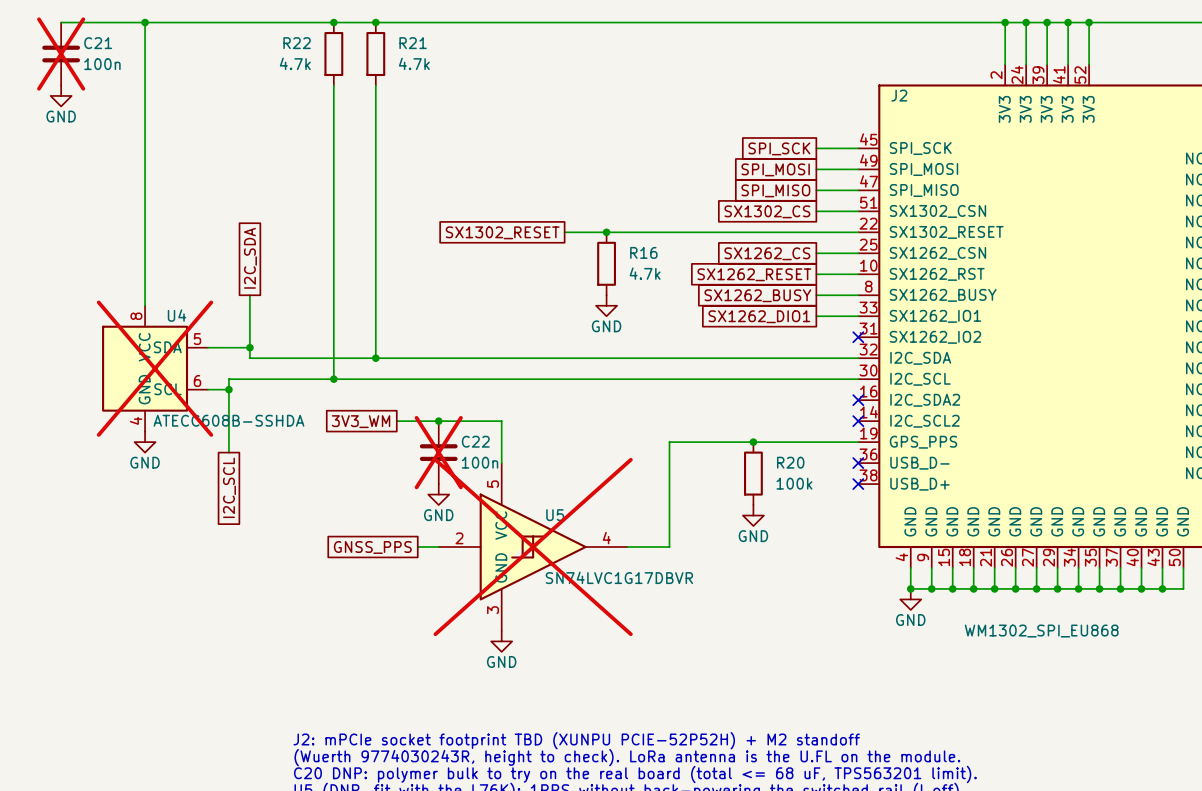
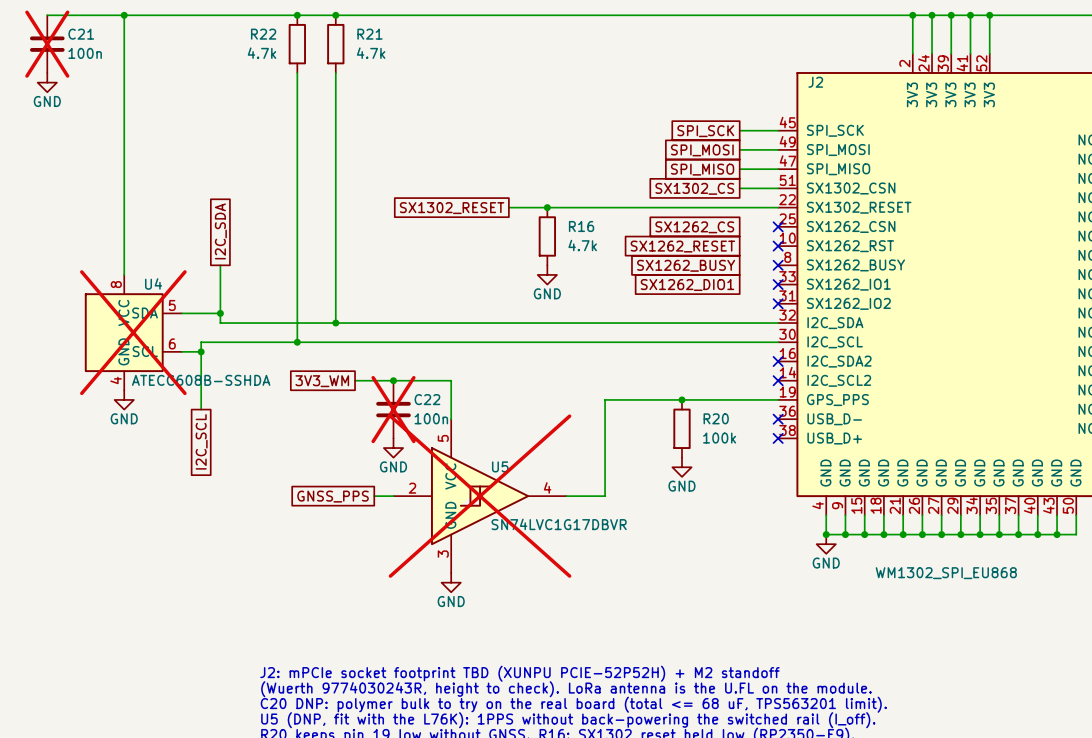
wire: (816, 253) (858, 253) -> none
no-connect mark: none -> (778, 226)
wire: (816, 274) (858, 274) -> none
no-connect mark: none -> (778, 246)
wire: (816, 295) (858, 295) -> none
no-connect mark: none -> (778, 265)
wire: (816, 316) (858, 316) -> none
no-connect mark: none -> (778, 284)

